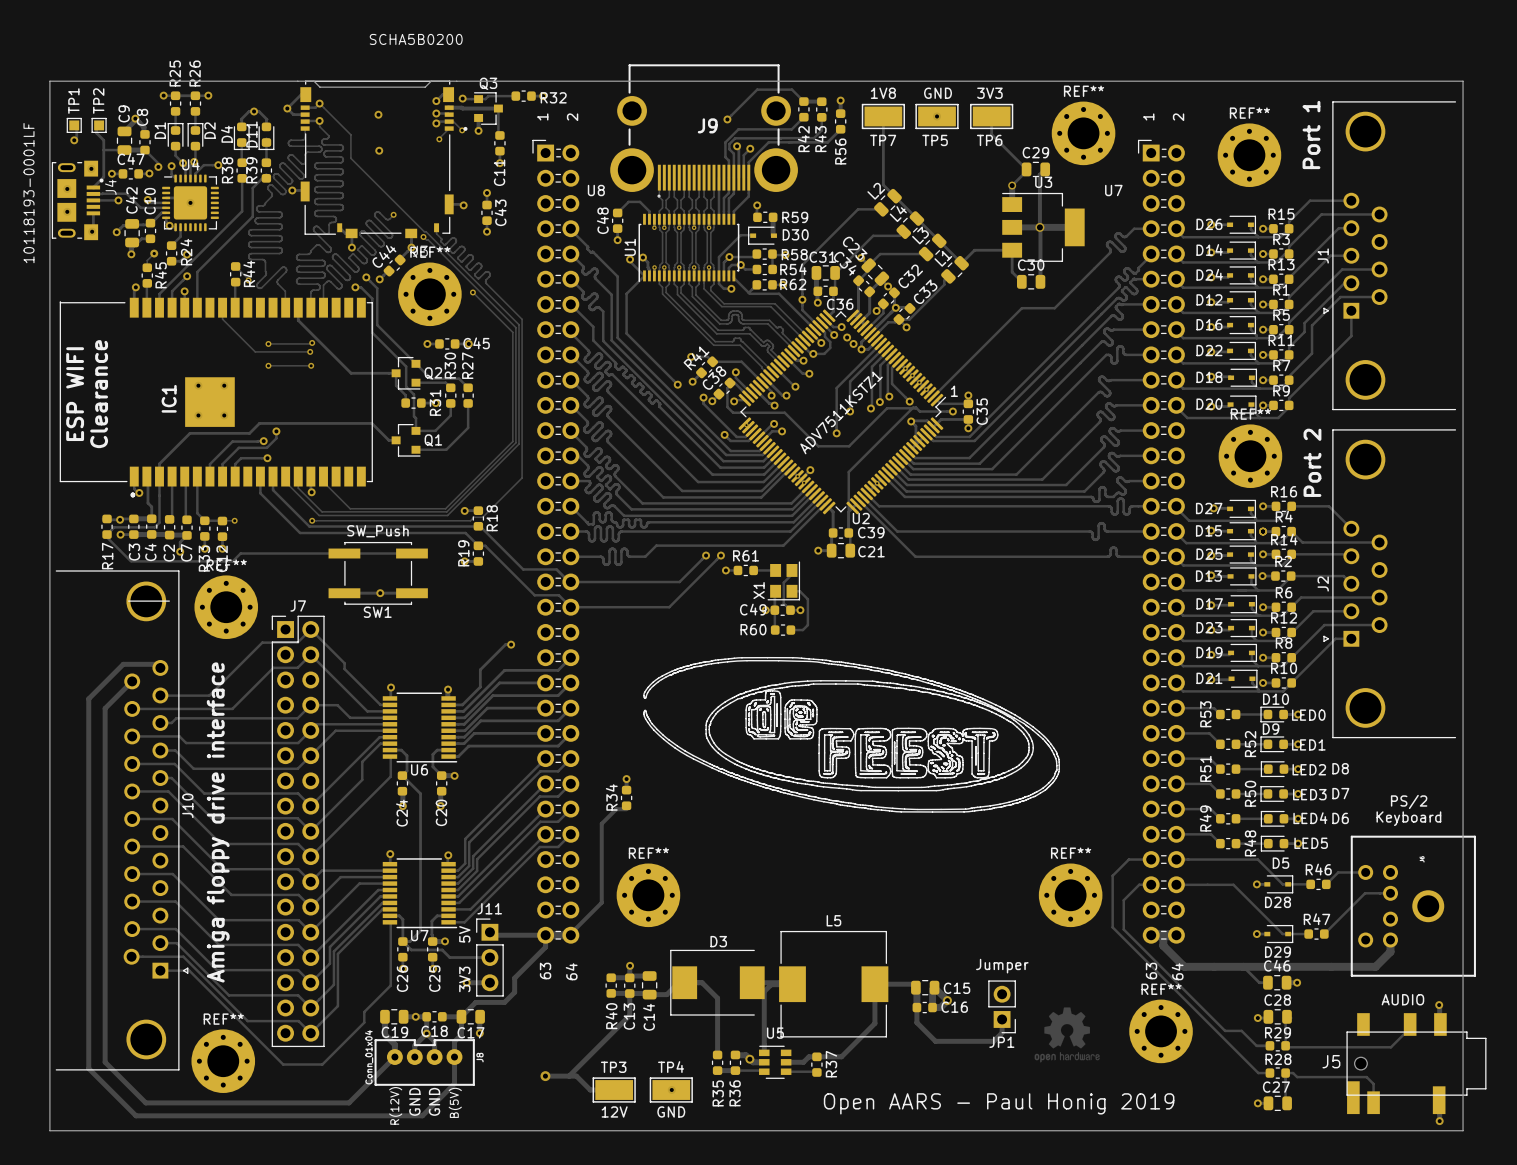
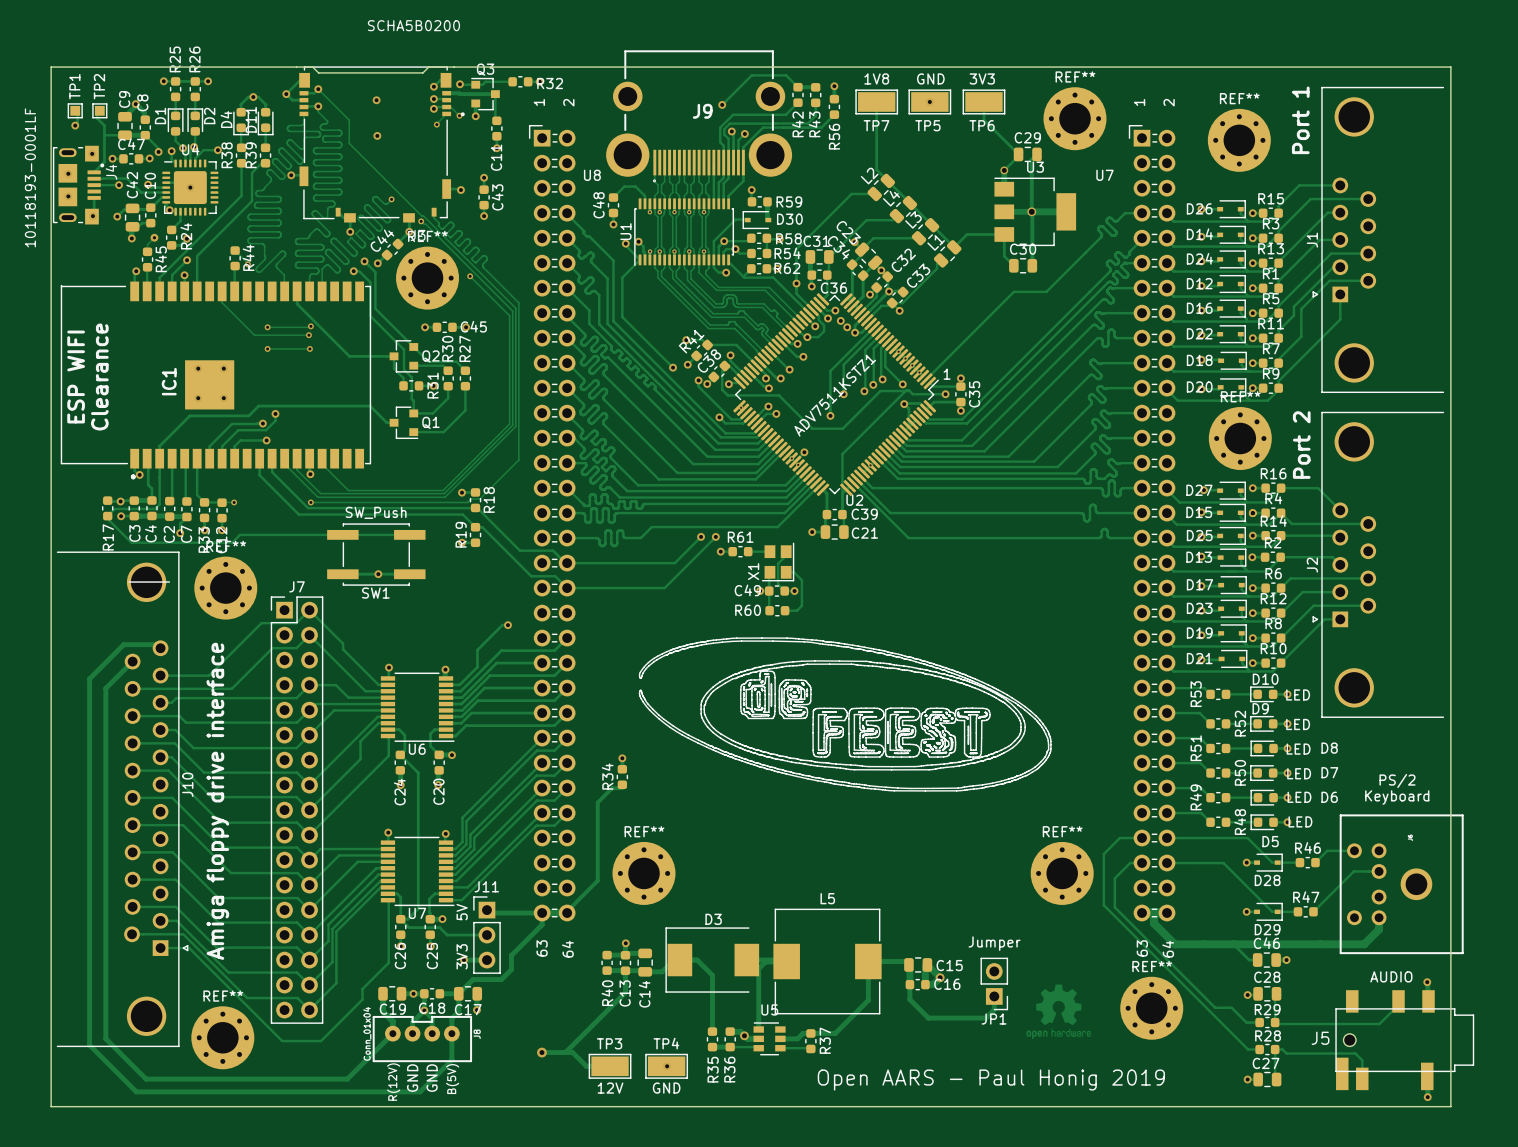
D10 value: LED0 (1308, 715) -> LED (1298, 694)
D9 value: LED1 (1308, 744) -> LED (1298, 724)
D8 value: LED2 (1309, 769) -> LED (1298, 749)
D7 value: LED3 (1309, 794) -> LED (1299, 773)
D6 value: LED4 (1310, 818) -> LED (1299, 797)
D5 value: LED5 (1311, 843) -> LED (1300, 821)

